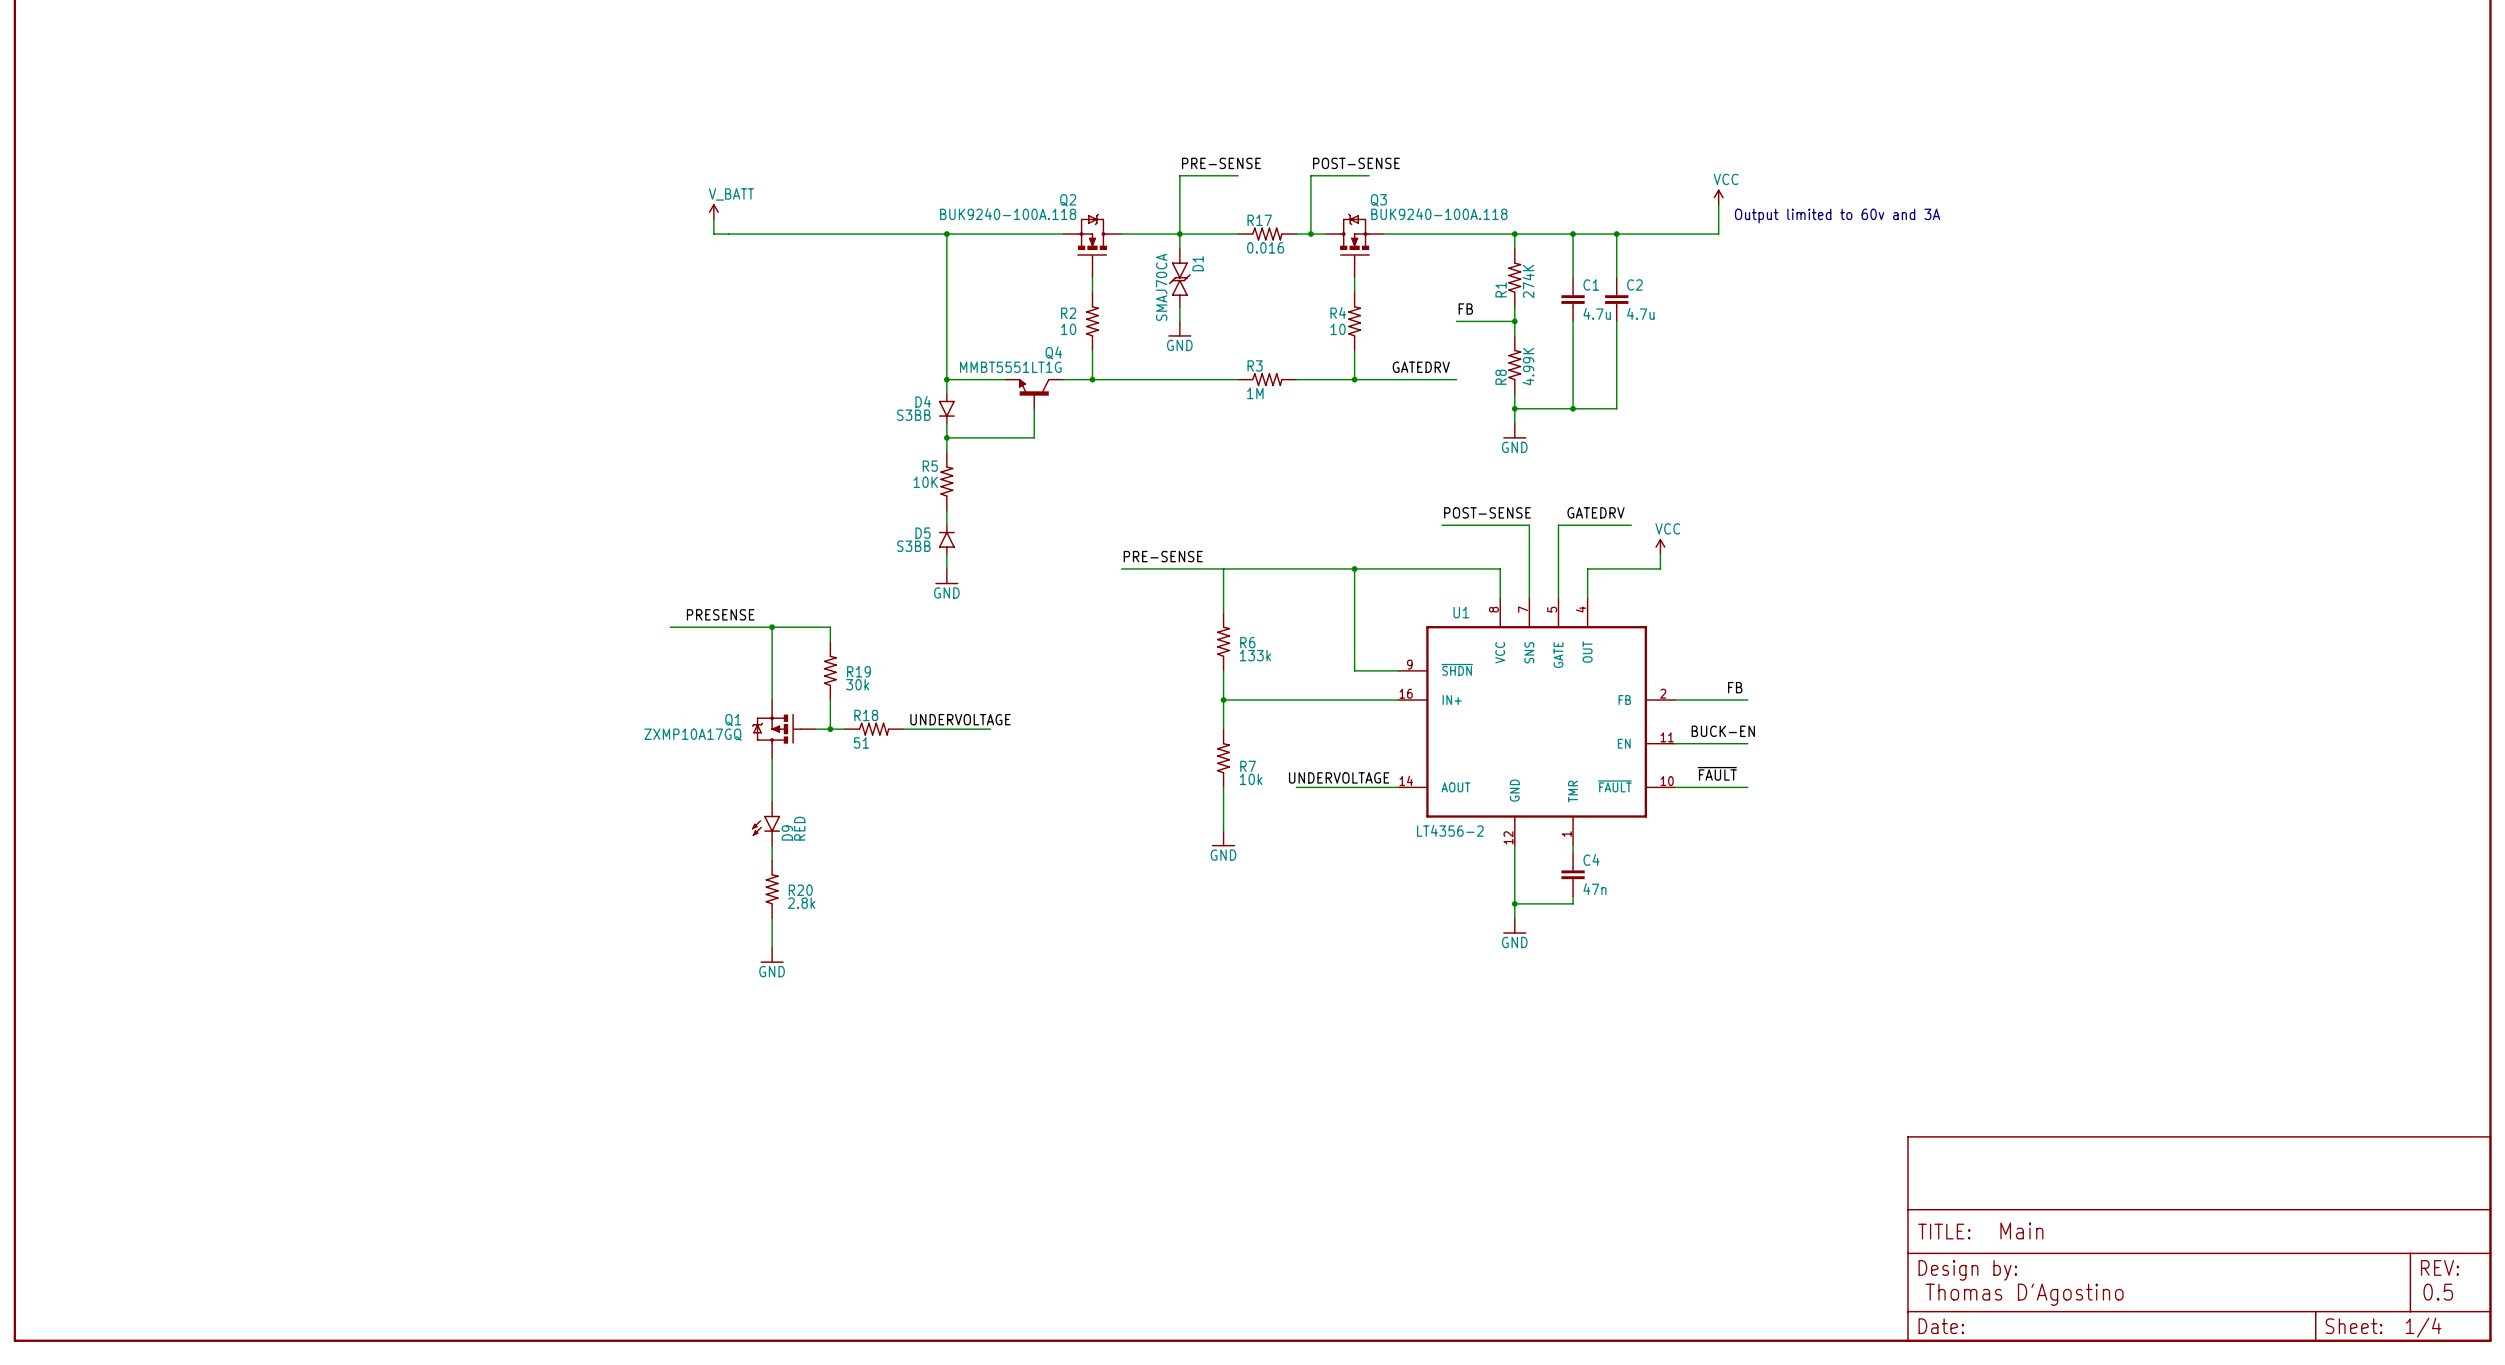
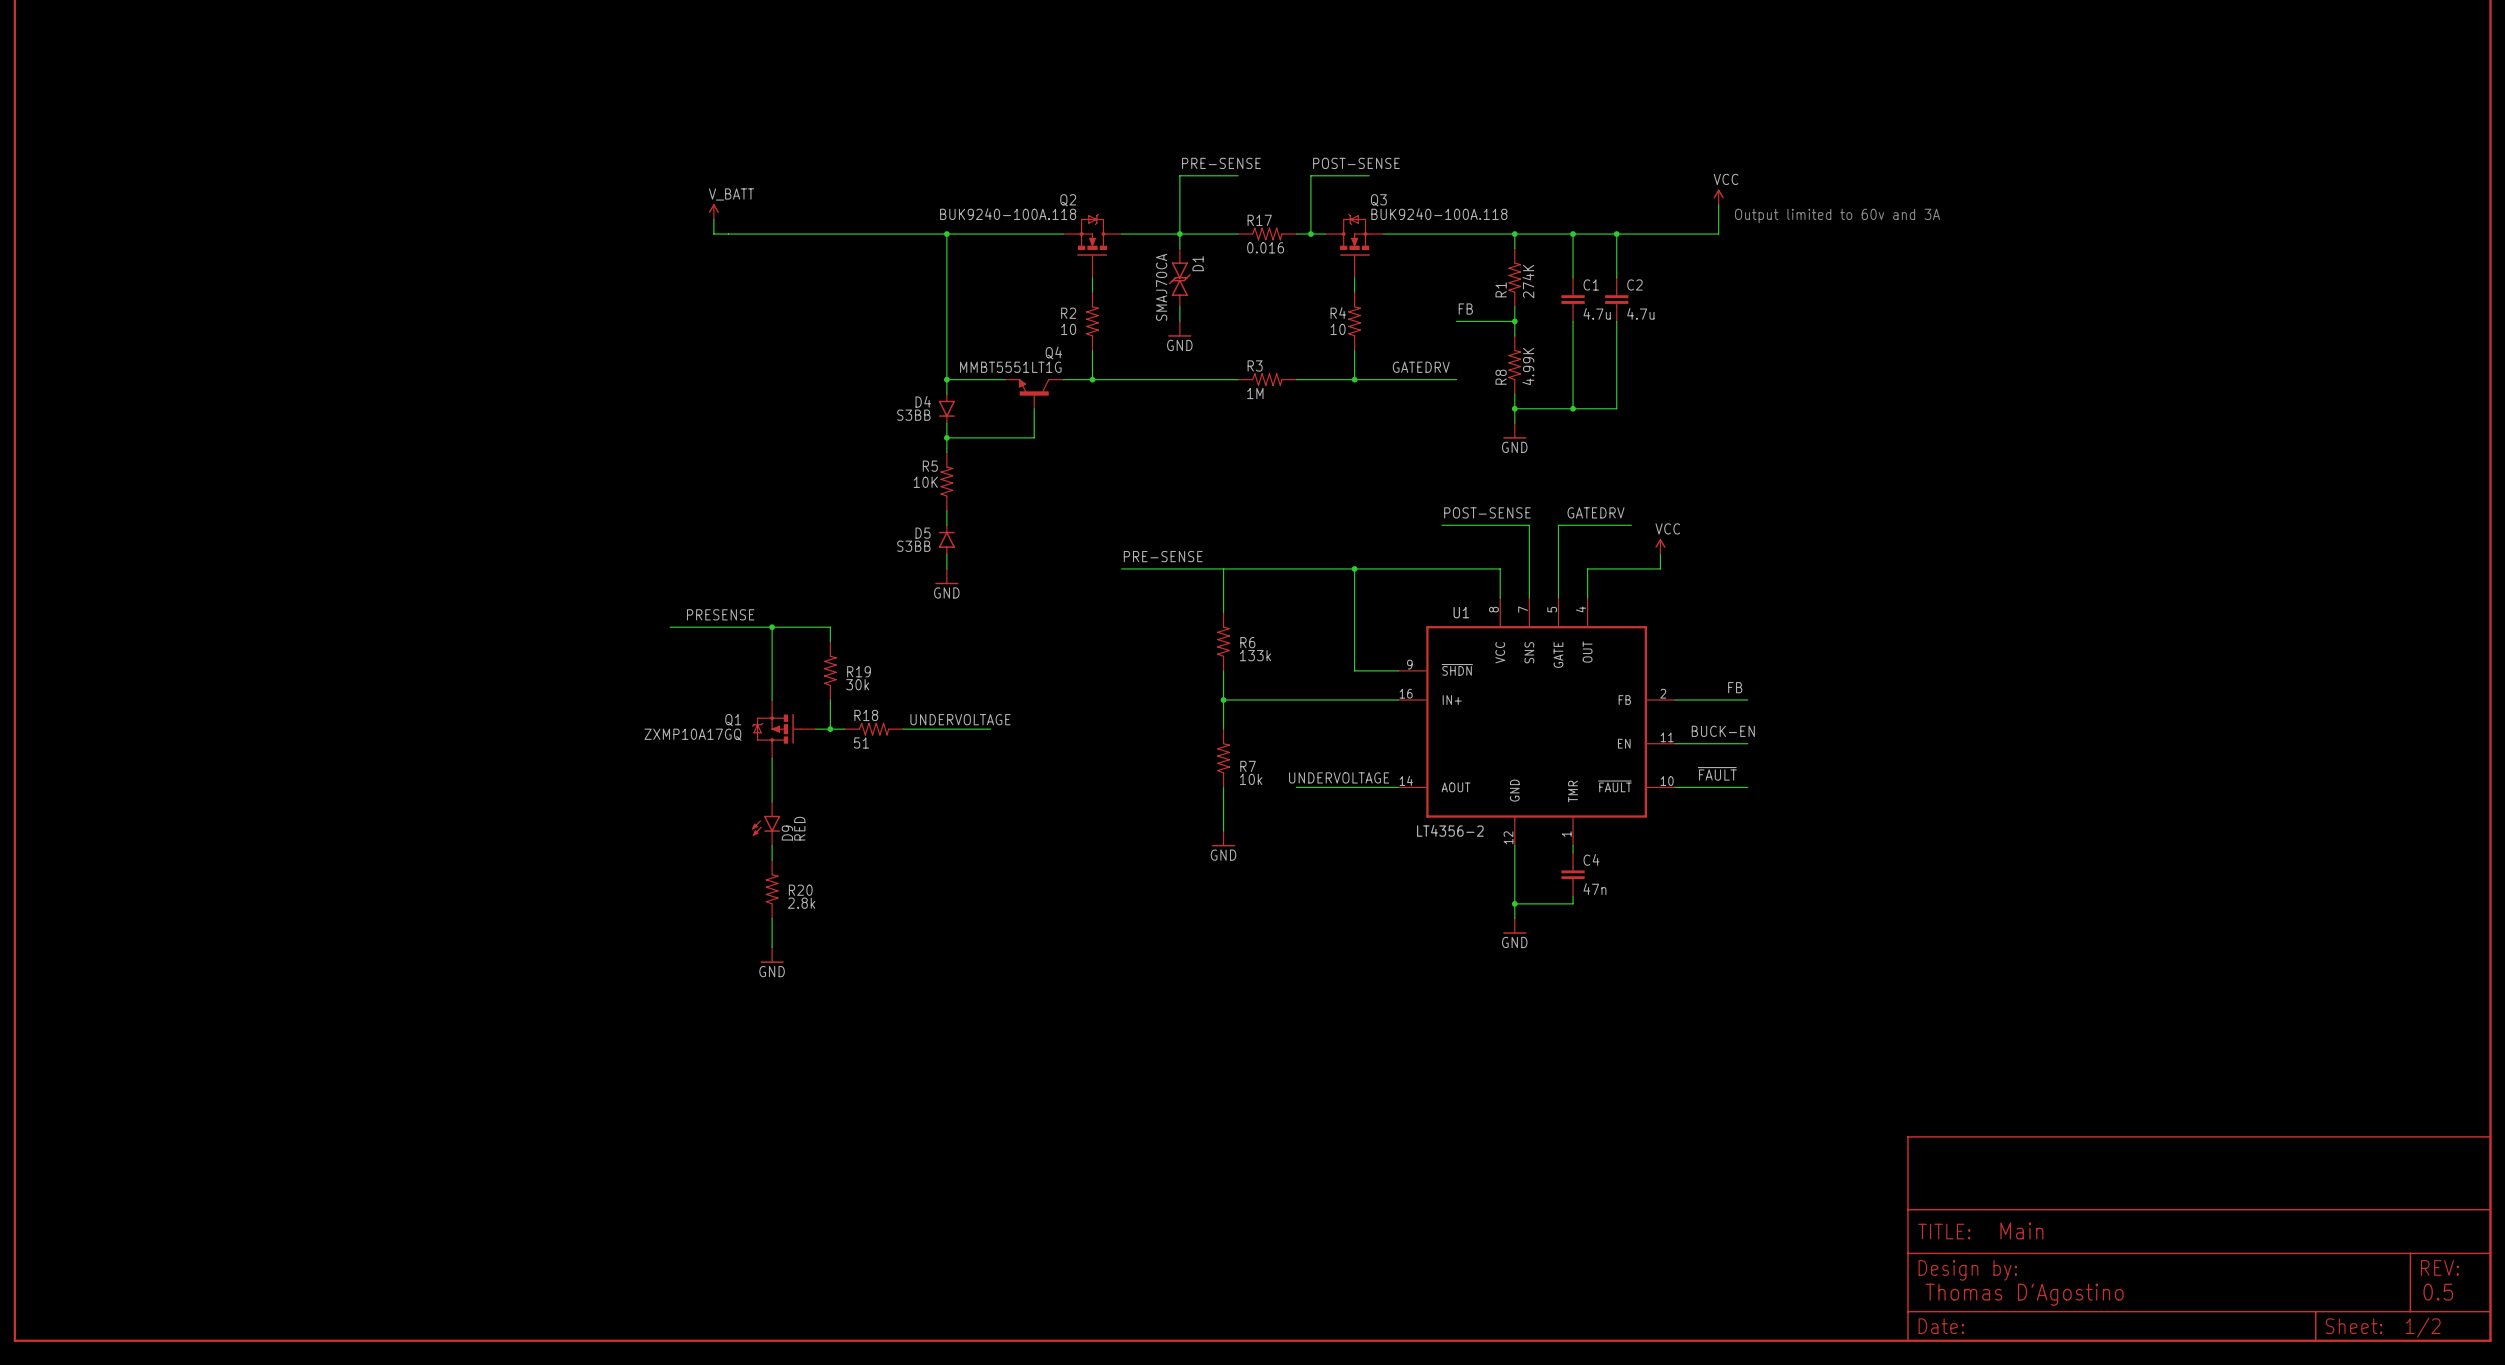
part text: 1/4 (2423, 1327) -> 1/2 (2423, 1327)

